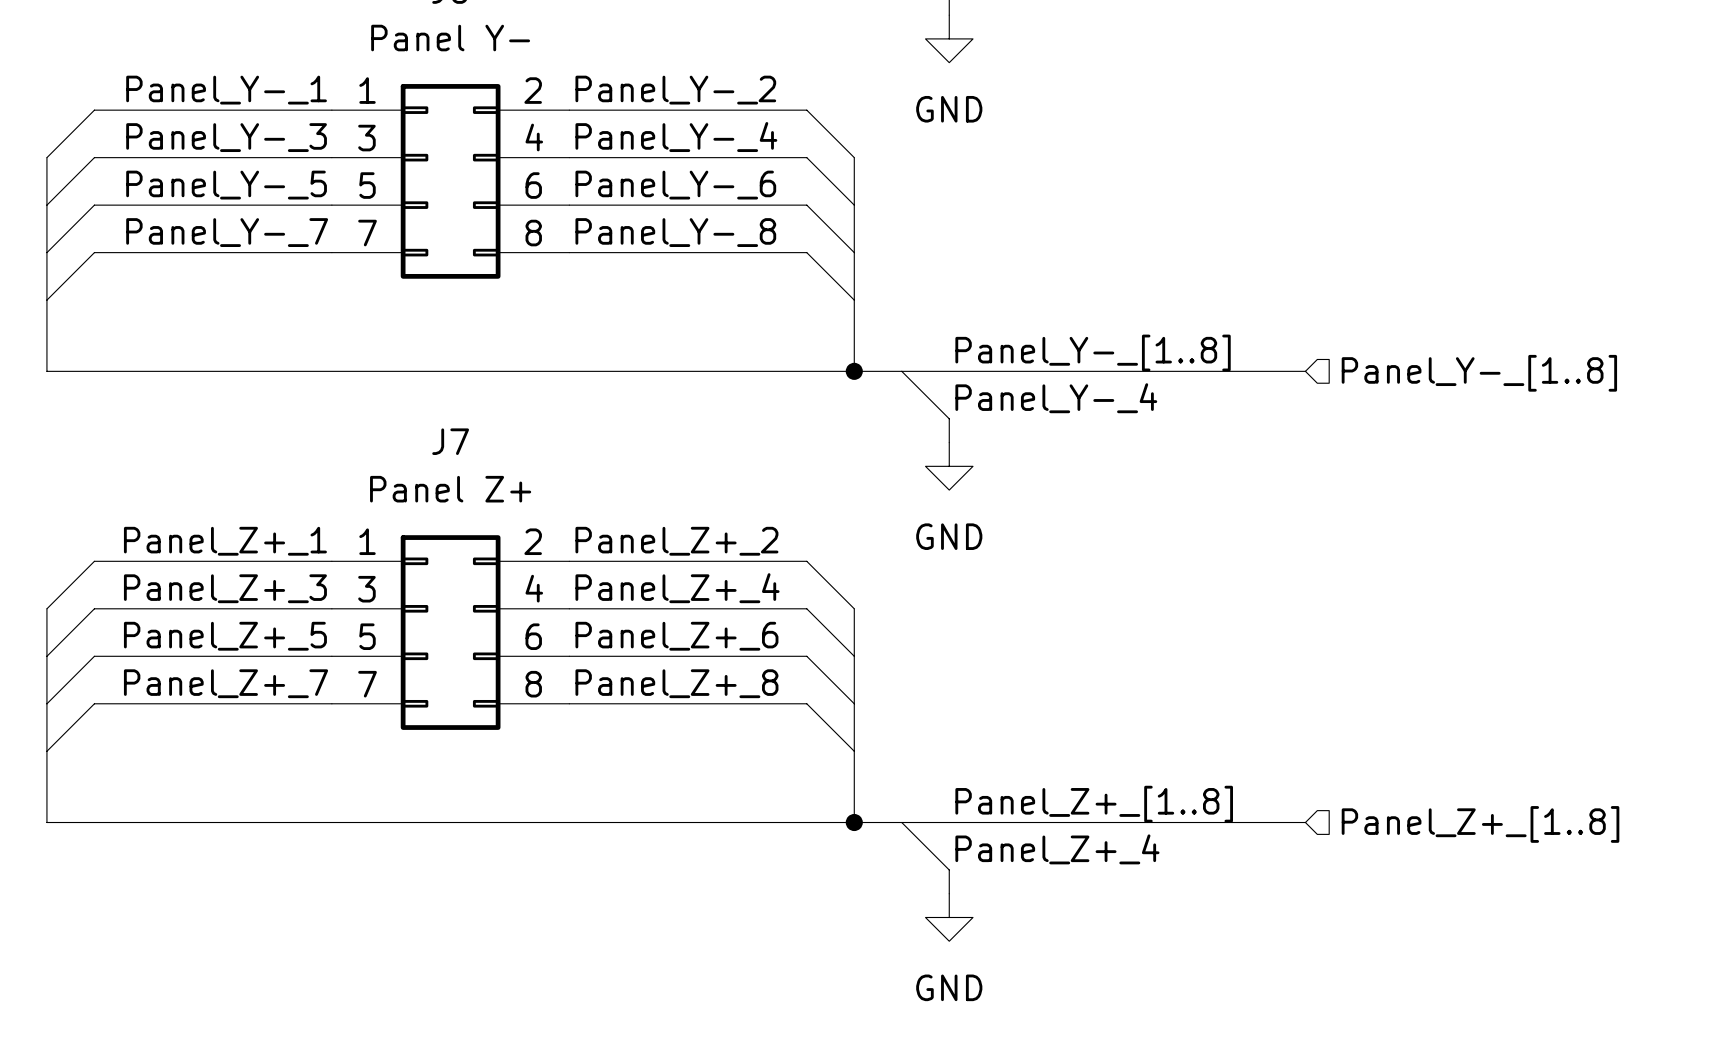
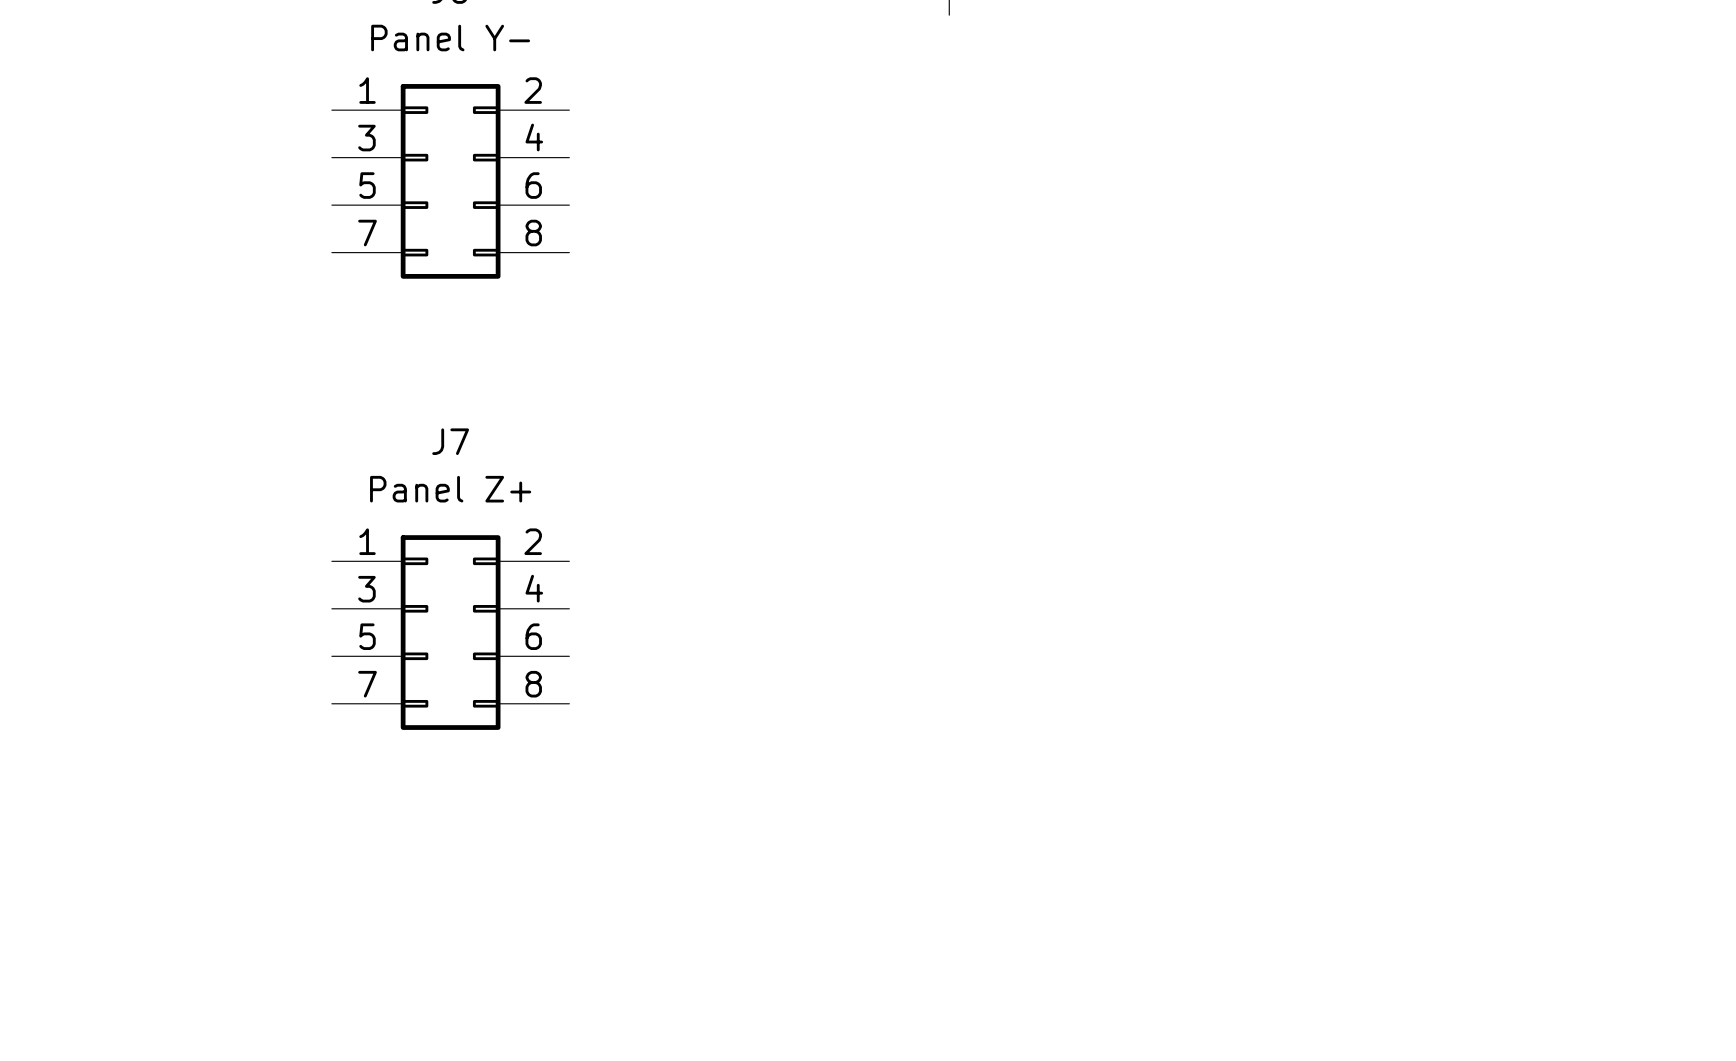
power symbol: GND (949, 38) -> none
label: Panel_Y-_1 (226, 90) -> none
label: Panel_Y-_2 (675, 90) -> none
wire: (331, 110) (94, 110) (46, 157) -> none
wire: (569, 110) (806, 110) (854, 157) -> none
label: Panel_Y-_3 (226, 137) -> none
label: Panel_Y-_4 (676, 137) -> none
bus: (46, 157) (46, 371) (1305, 371) -> none
wire: (331, 157) (94, 157) (46, 205) -> none
wire: (569, 157) (806, 157) (854, 205) -> none
bus: (854, 157) (854, 371) -> none
label: Panel_Y-_5 (226, 185) -> none
label: Panel_Y-_6 (675, 185) -> none
wire: (331, 205) (94, 205) (46, 252) -> none
wire: (569, 205) (806, 205) (854, 252) -> none
label: Panel_Y-_7 (227, 232) -> none
label: Panel_Y-_8 (675, 232) -> none
wire: (331, 252) (94, 252) (46, 300) -> none
wire: (569, 252) (806, 252) (854, 300) -> none
label: Panel_Y-_[1..8] (1093, 352) -> none
junction: (854, 371) -> none
wire: (901, 371) (949, 418) (949, 442) -> none
hierarchical label: Panel_Y-_[1..8] (1479, 373) -> none
label: Panel_Y-_4 (1056, 398) -> none
power symbol: GND (949, 466) -> none
label: Panel_Z+_1 (225, 541) -> none
label: Panel_Z+_2 (676, 541) -> none
wire: (331, 561) (94, 561) (46, 608) -> none
wire: (569, 561) (806, 561) (854, 608) -> none
label: Panel_Z+_3 (225, 588) -> none
label: Panel_Z+_4 (677, 588) -> none
bus: (46, 608) (46, 822) (1305, 822) -> none
wire: (331, 608) (94, 608) (46, 656) -> none
wire: (569, 608) (806, 608) (854, 656) -> none
bus: (854, 608) (854, 822) -> none
label: Panel_Z+_5 (225, 636) -> none
label: Panel_Z+_6 (676, 636) -> none
wire: (331, 656) (94, 656) (46, 703) -> none
wire: (569, 656) (806, 656) (854, 703) -> none
label: Panel_Z+_7 (225, 683) -> none
label: Panel_Z+_8 (676, 683) -> none
wire: (331, 703) (94, 703) (46, 751) -> none
wire: (569, 703) (806, 703) (854, 751) -> none
label: Panel_Z+_[1..8] (1094, 804) -> none
junction: (854, 822) -> none
wire: (901, 822) (949, 870) (949, 893) -> none
hierarchical label: Panel_Z+_[1..8] (1480, 824) -> none
label: Panel_Z+_4 (1057, 849) -> none
power symbol: GND (949, 917) -> none

